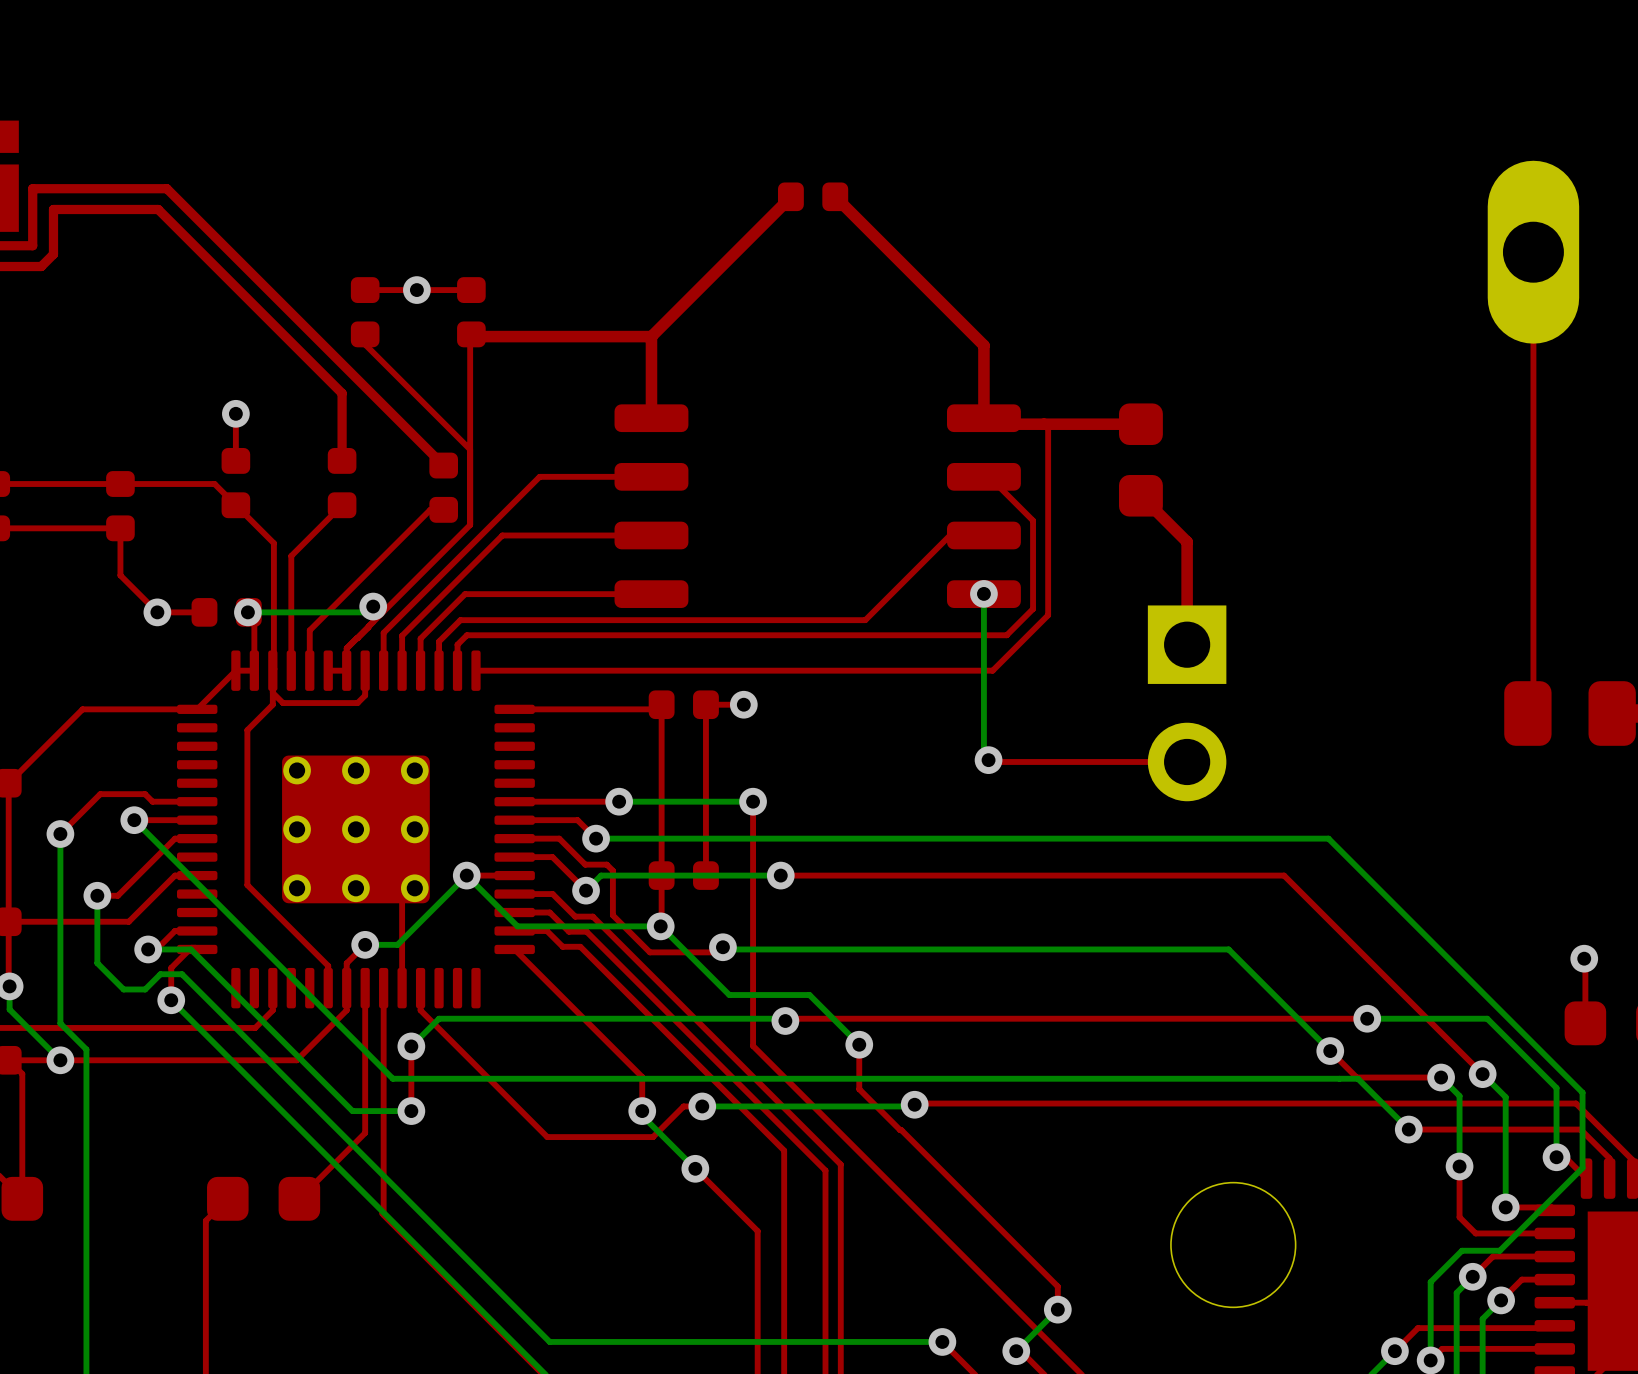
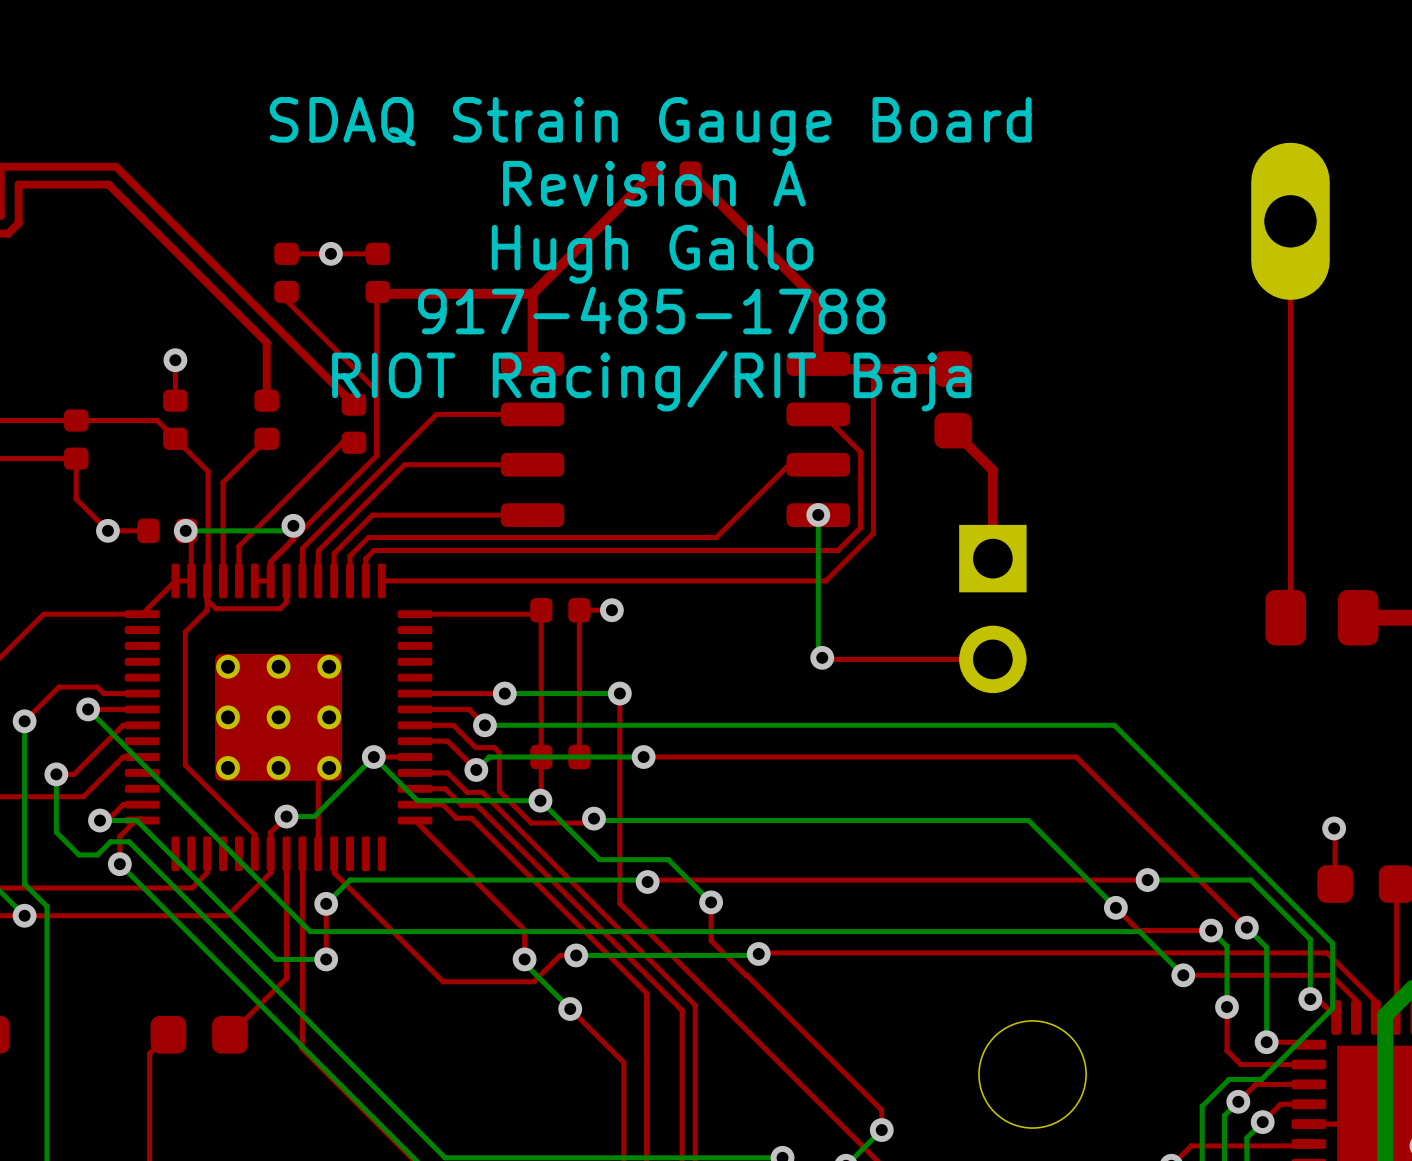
text: none -> SDAQ Strain Gauge Board (650, 126)
text: none -> Revision A (654, 183)
text: none -> Hugh Gallo (652, 254)
text: none -> 917-485-1788 (651, 310)
text: none -> RIOT Racing/RIT Baja (651, 381)

